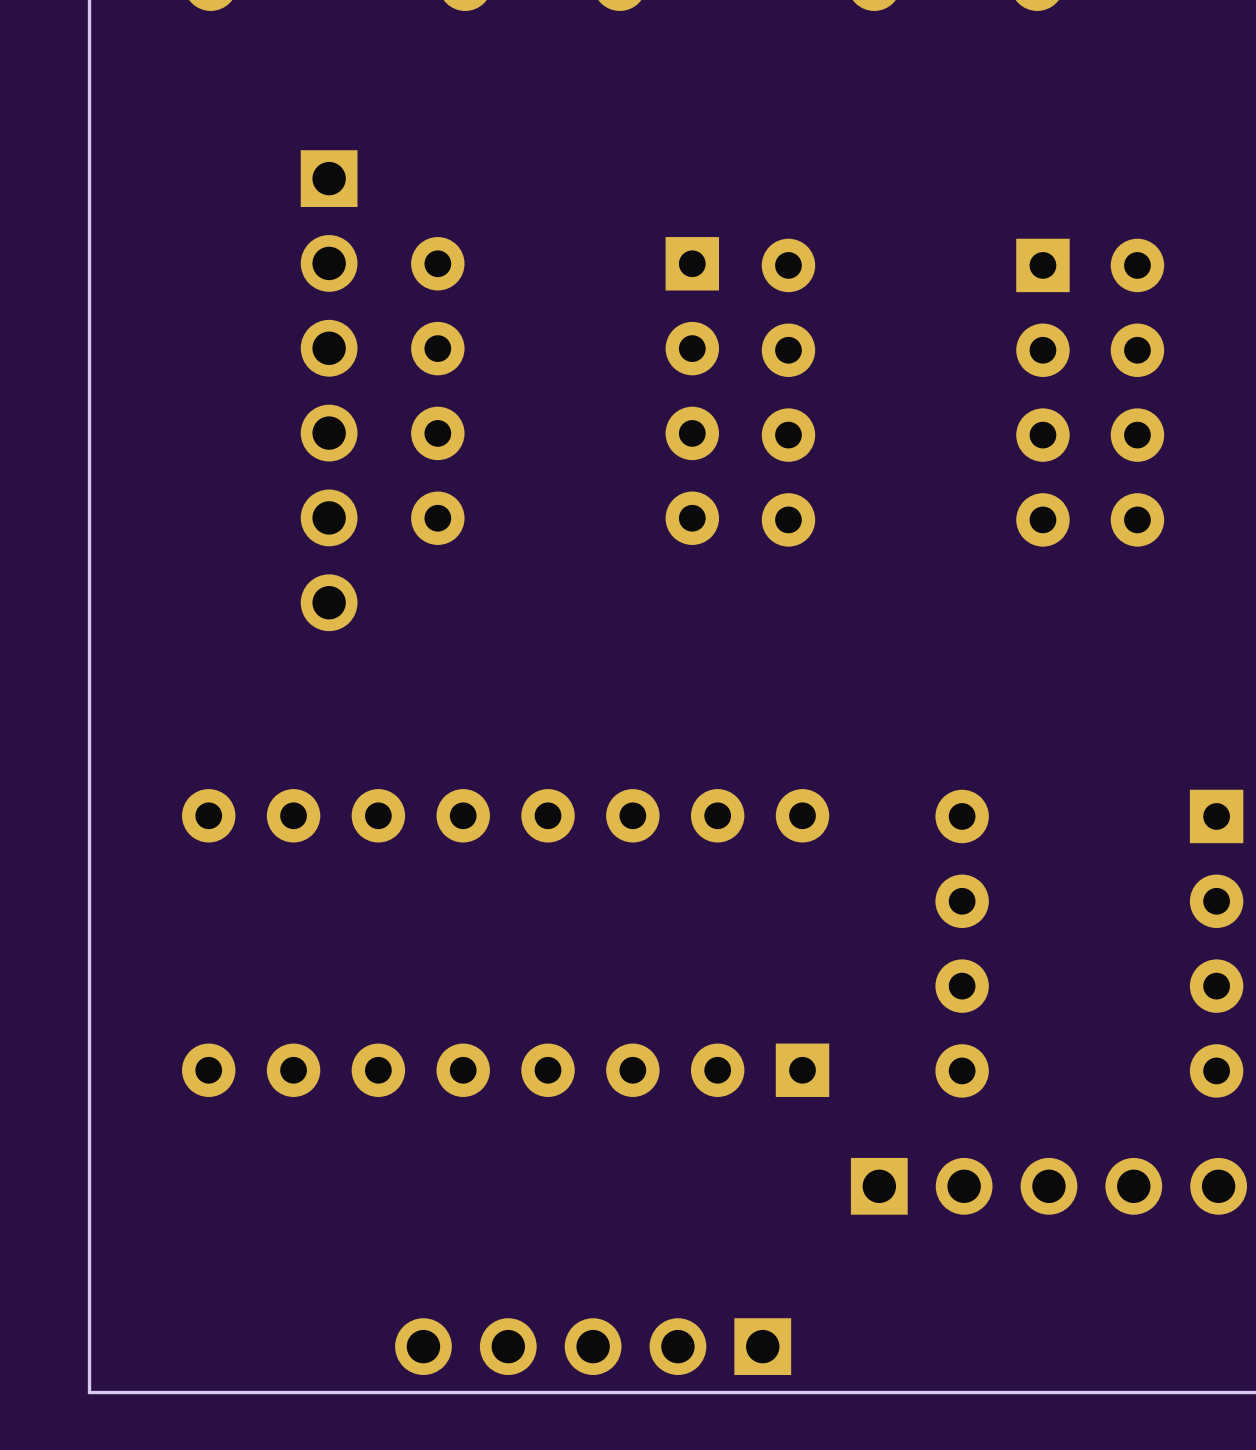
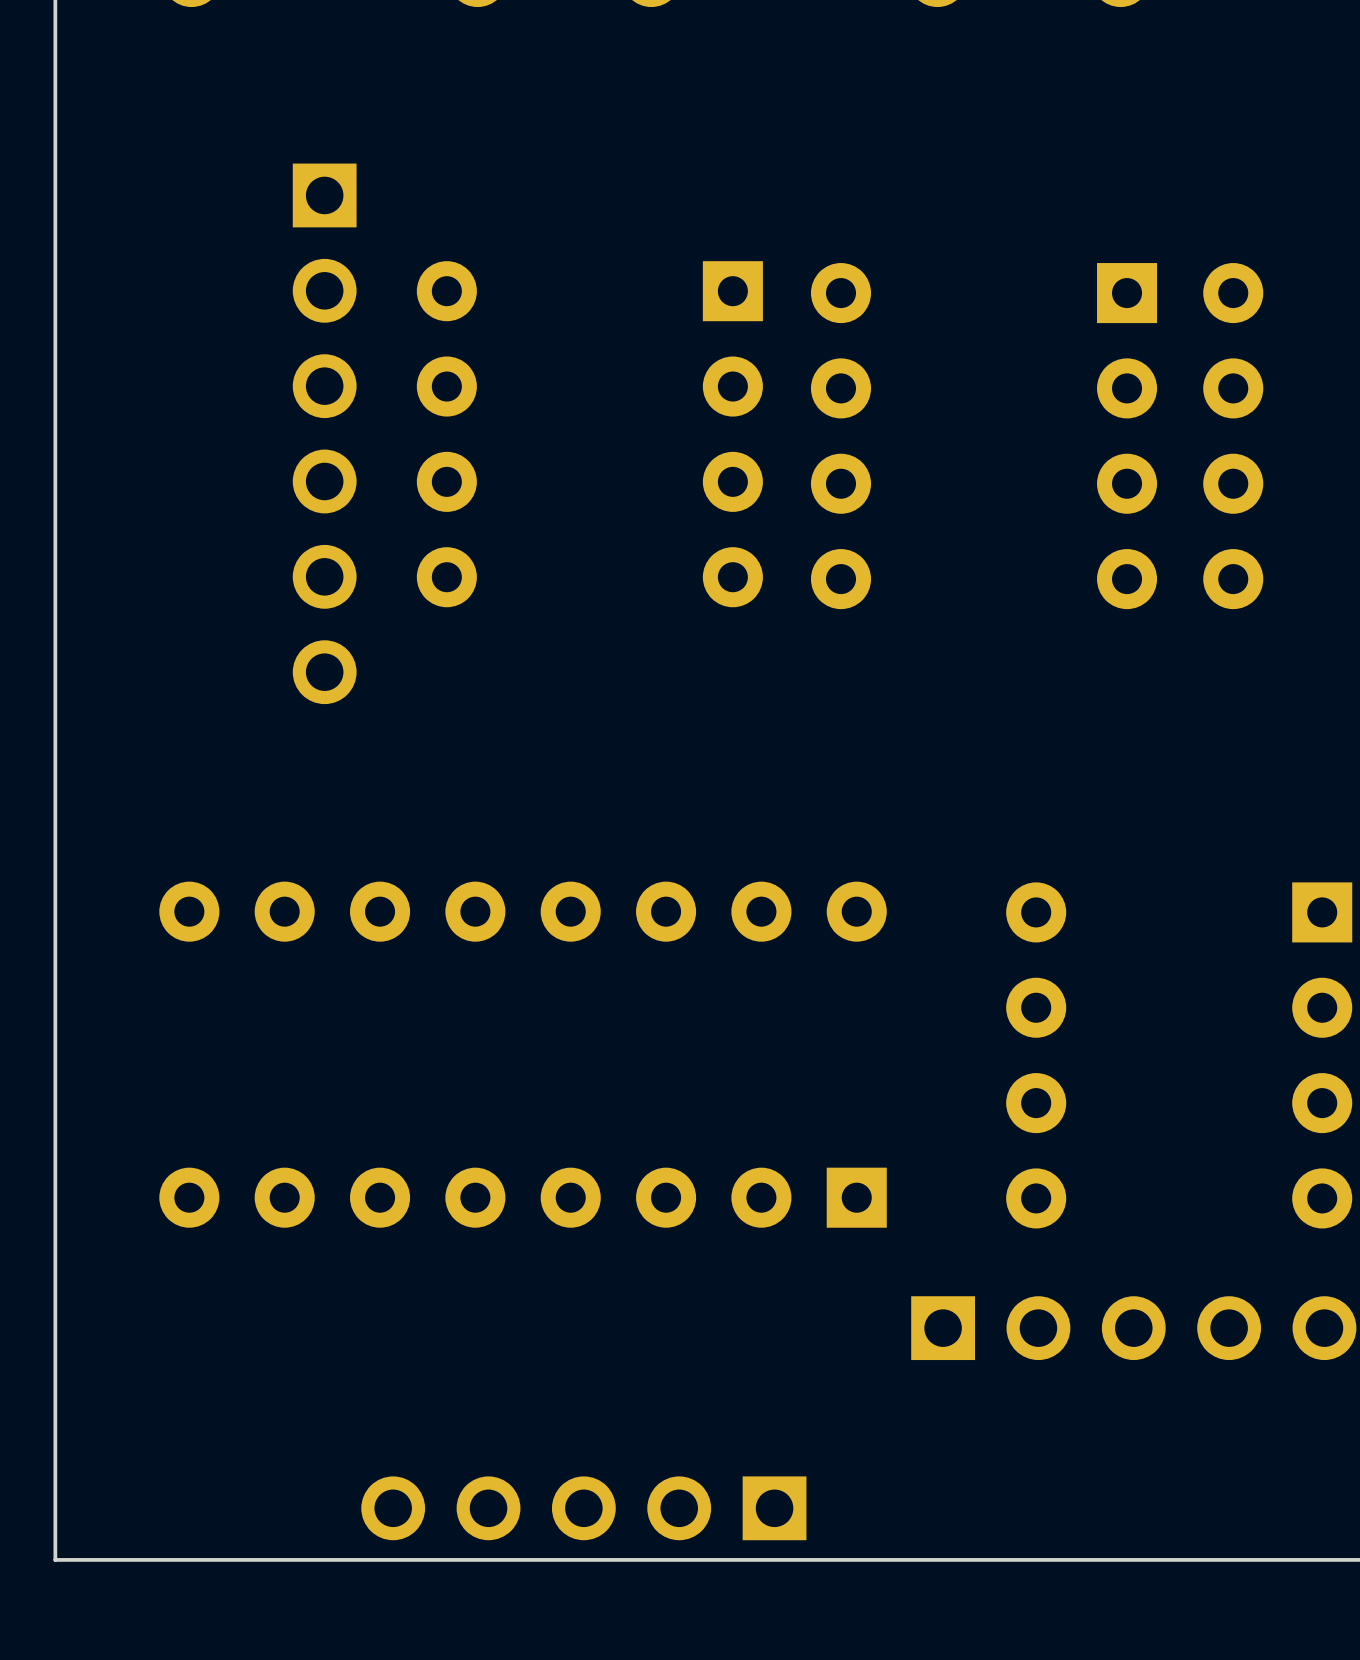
part position: (593, 1346) -> (583, 1508)

